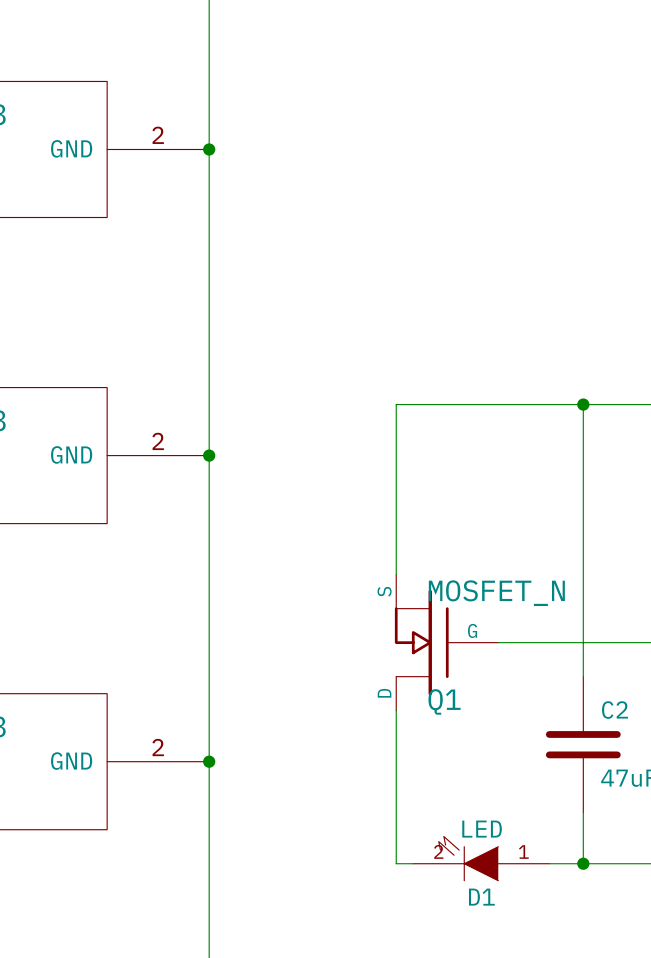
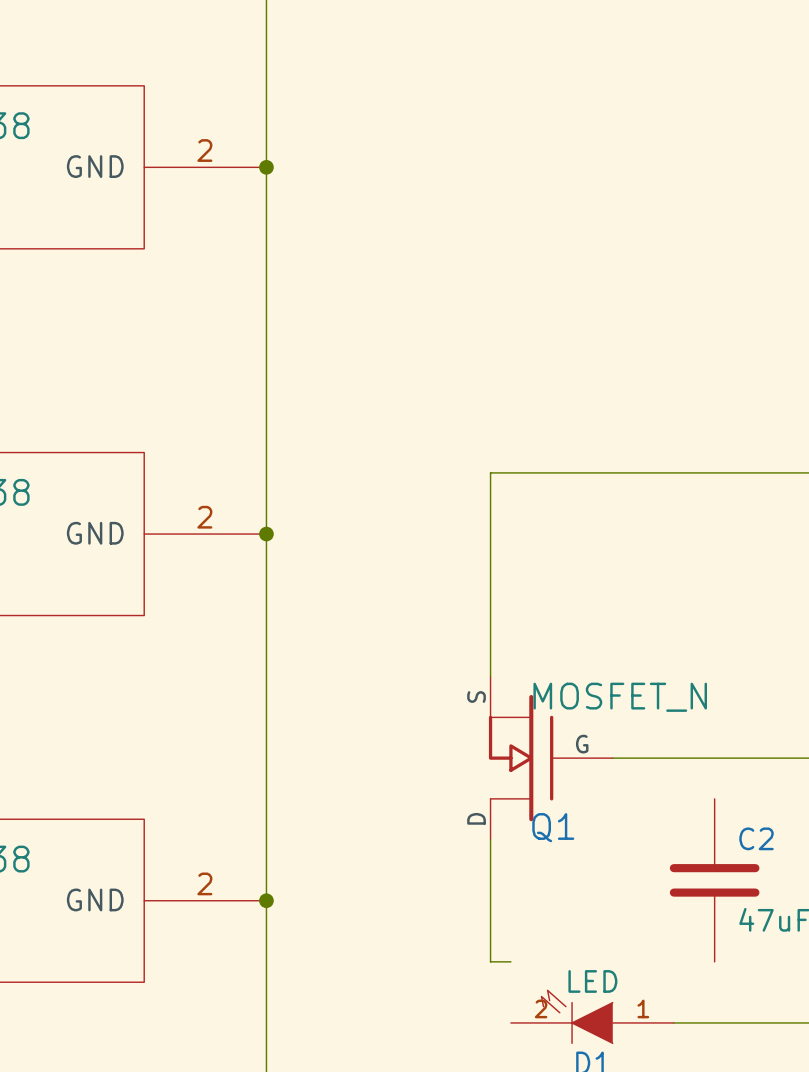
wire: (583, 404) (583, 676) -> none
junction: (583, 404) -> none
wire: (396, 812) (396, 863) (413, 863) -> (490, 961) (510, 961)
wire: (583, 812) (583, 863) -> none
junction: (583, 863) -> none

